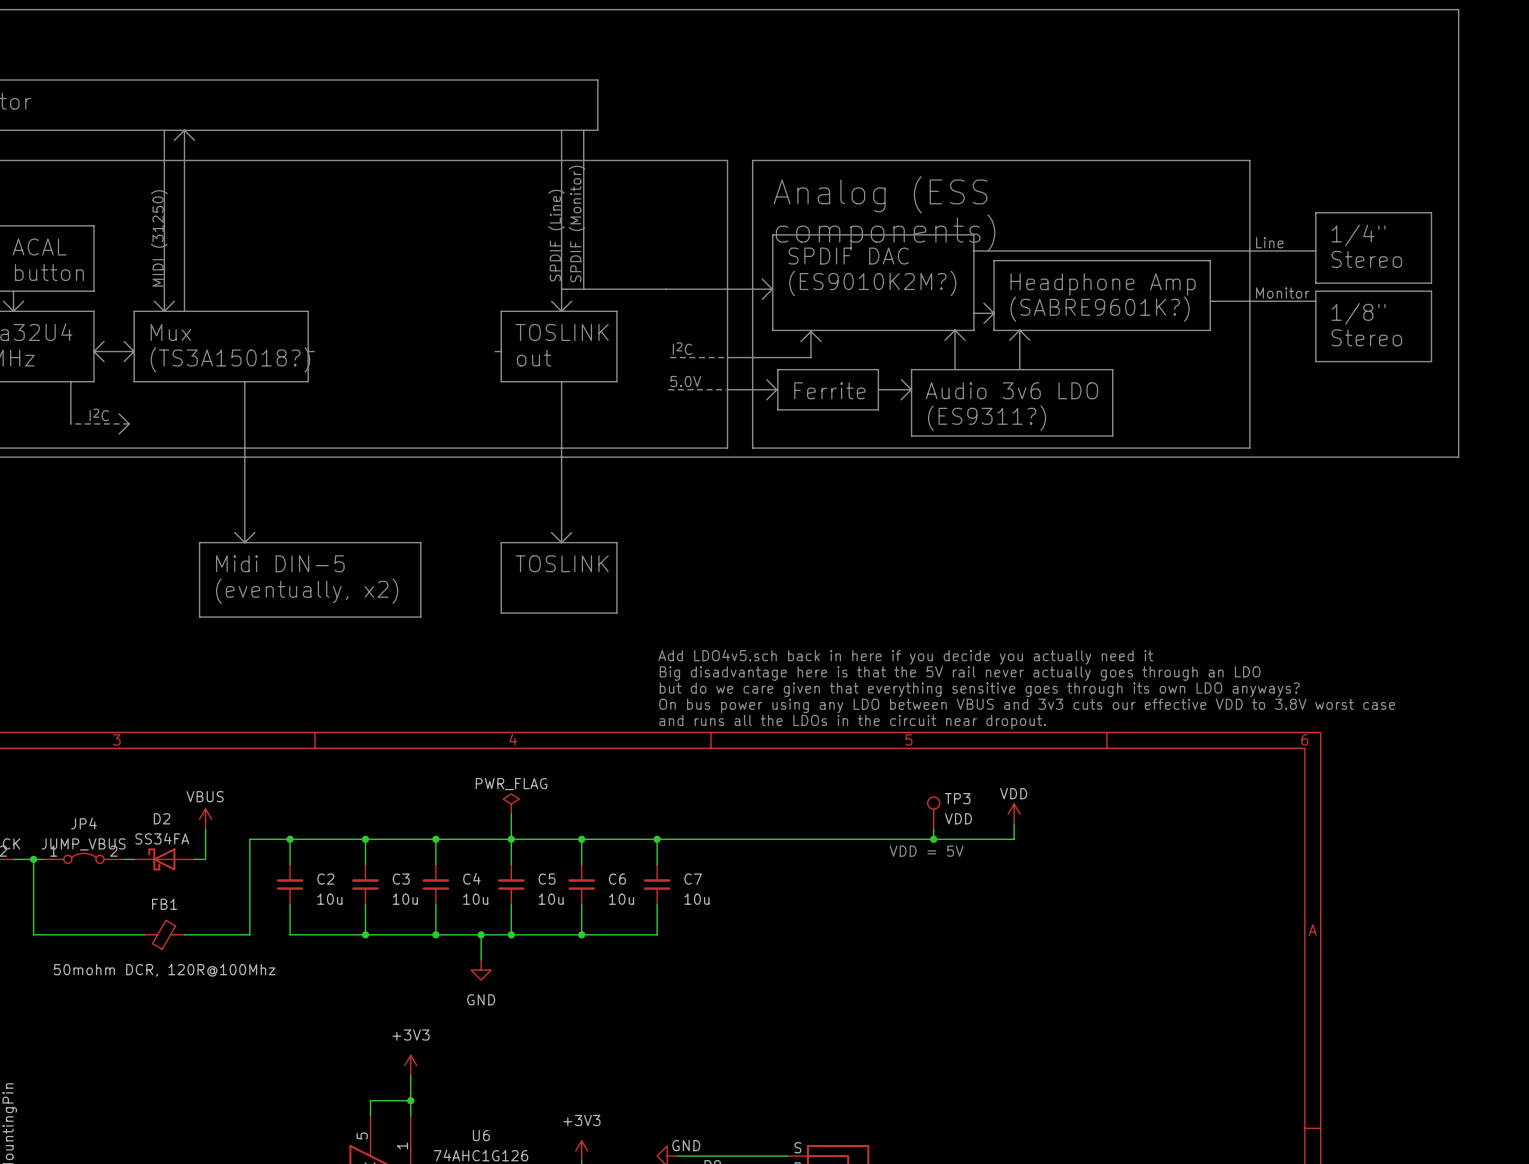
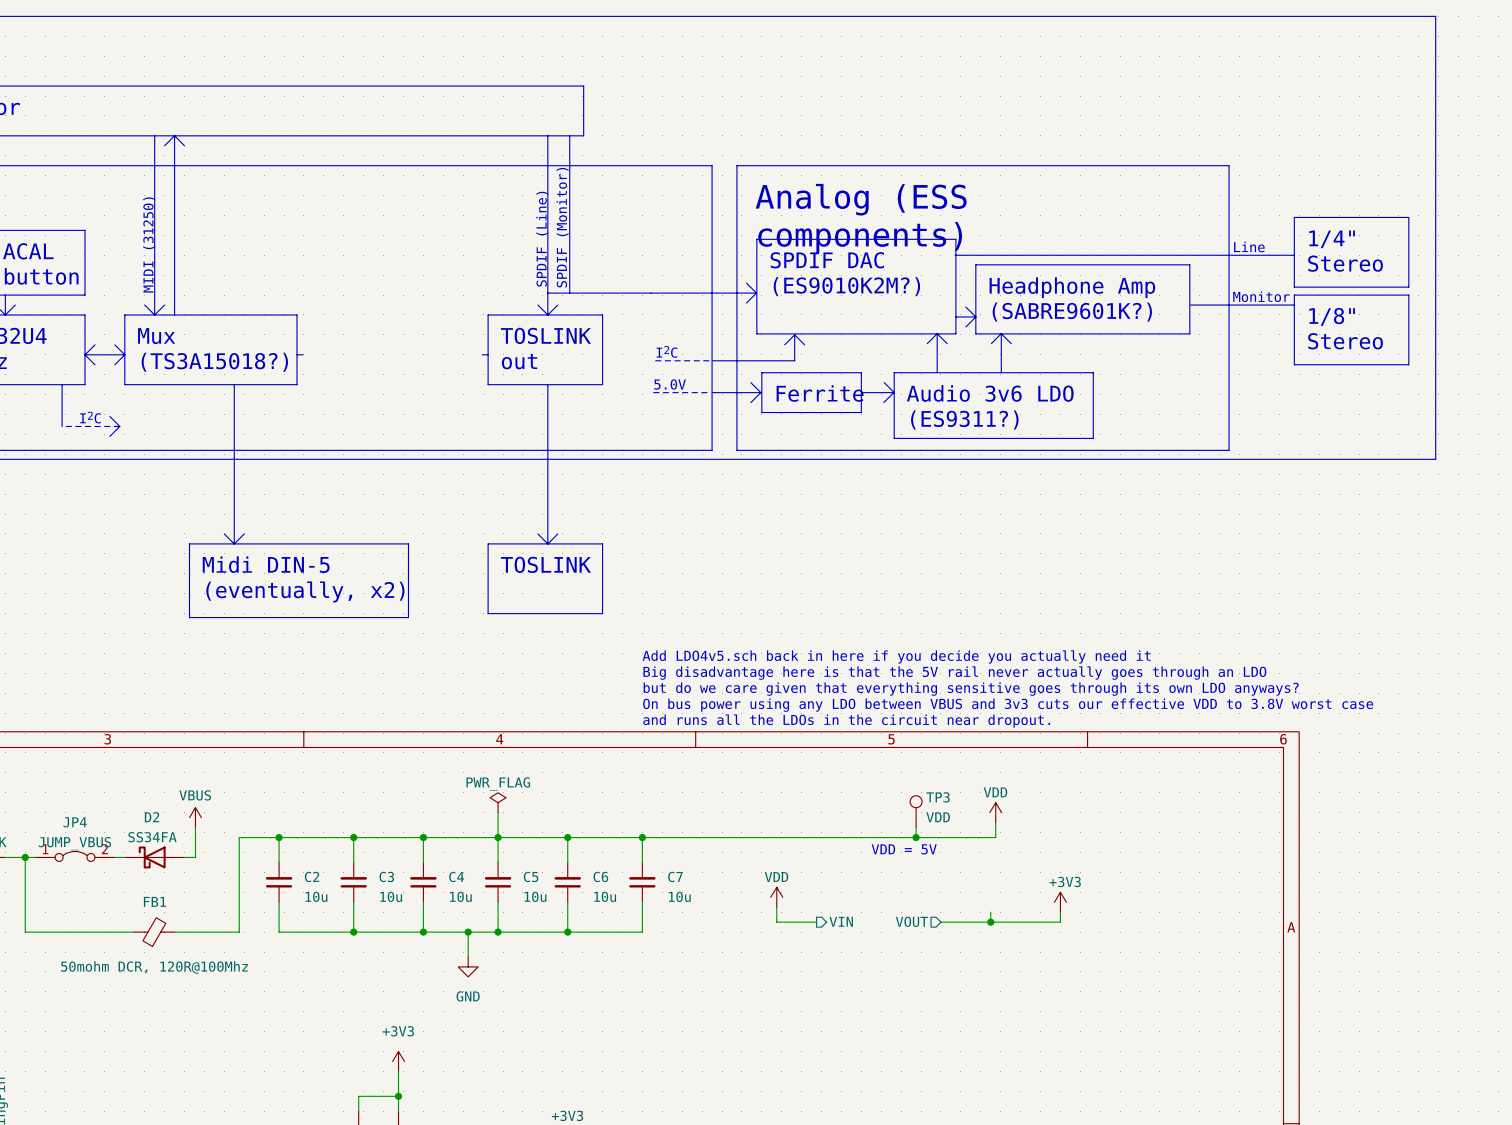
power symbol: none -> VDD (776, 897)
power symbol: none -> +3V3 (1060, 902)
wire: none -> (776, 907) (776, 922) (816, 922)
wire: none -> (990, 912) (990, 922)
wire: none -> (1060, 912) (1060, 922) (940, 922)
sheet pin: none -> VIN (841, 921)
sheet pin: none -> VOUT (911, 921)
junction: none -> (990, 922)

